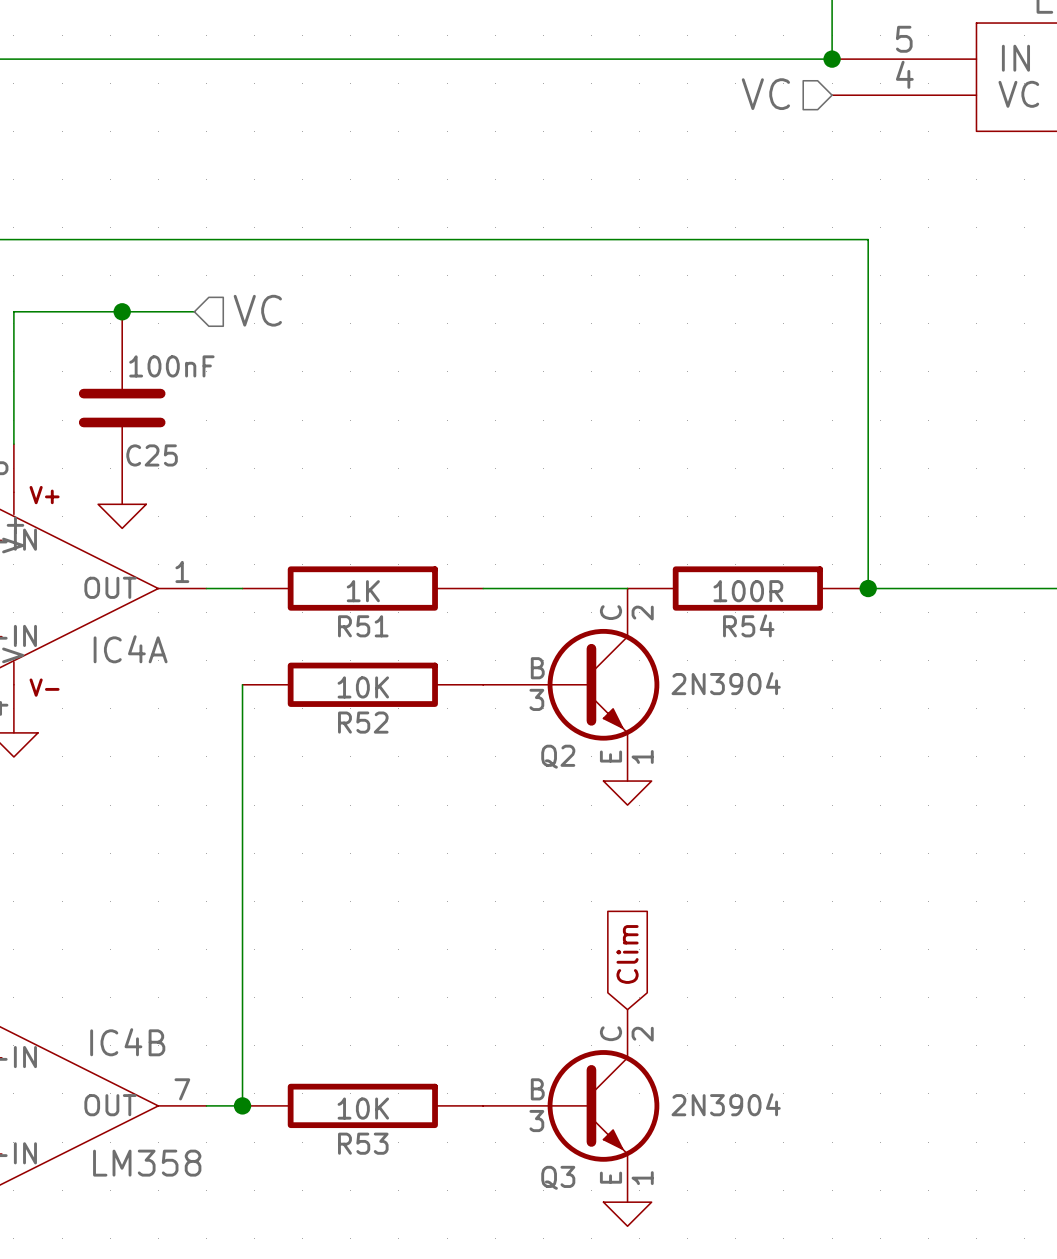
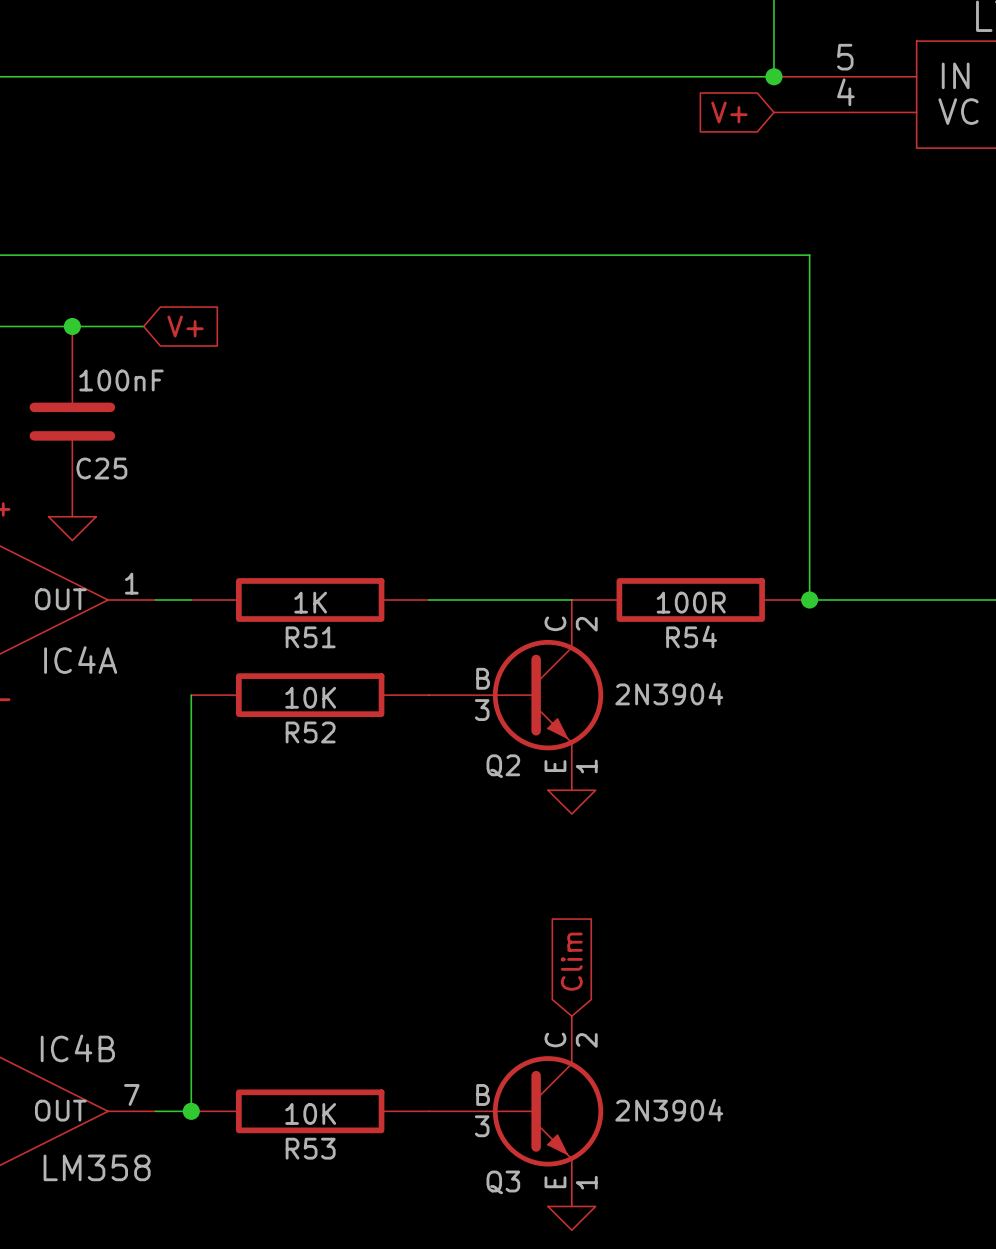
hierarchical label: VC (765, 94) -> none
global label: none -> V+ (729, 112)
hierarchical label: VC (257, 310) -> none
global label: none -> V+ (185, 326)

